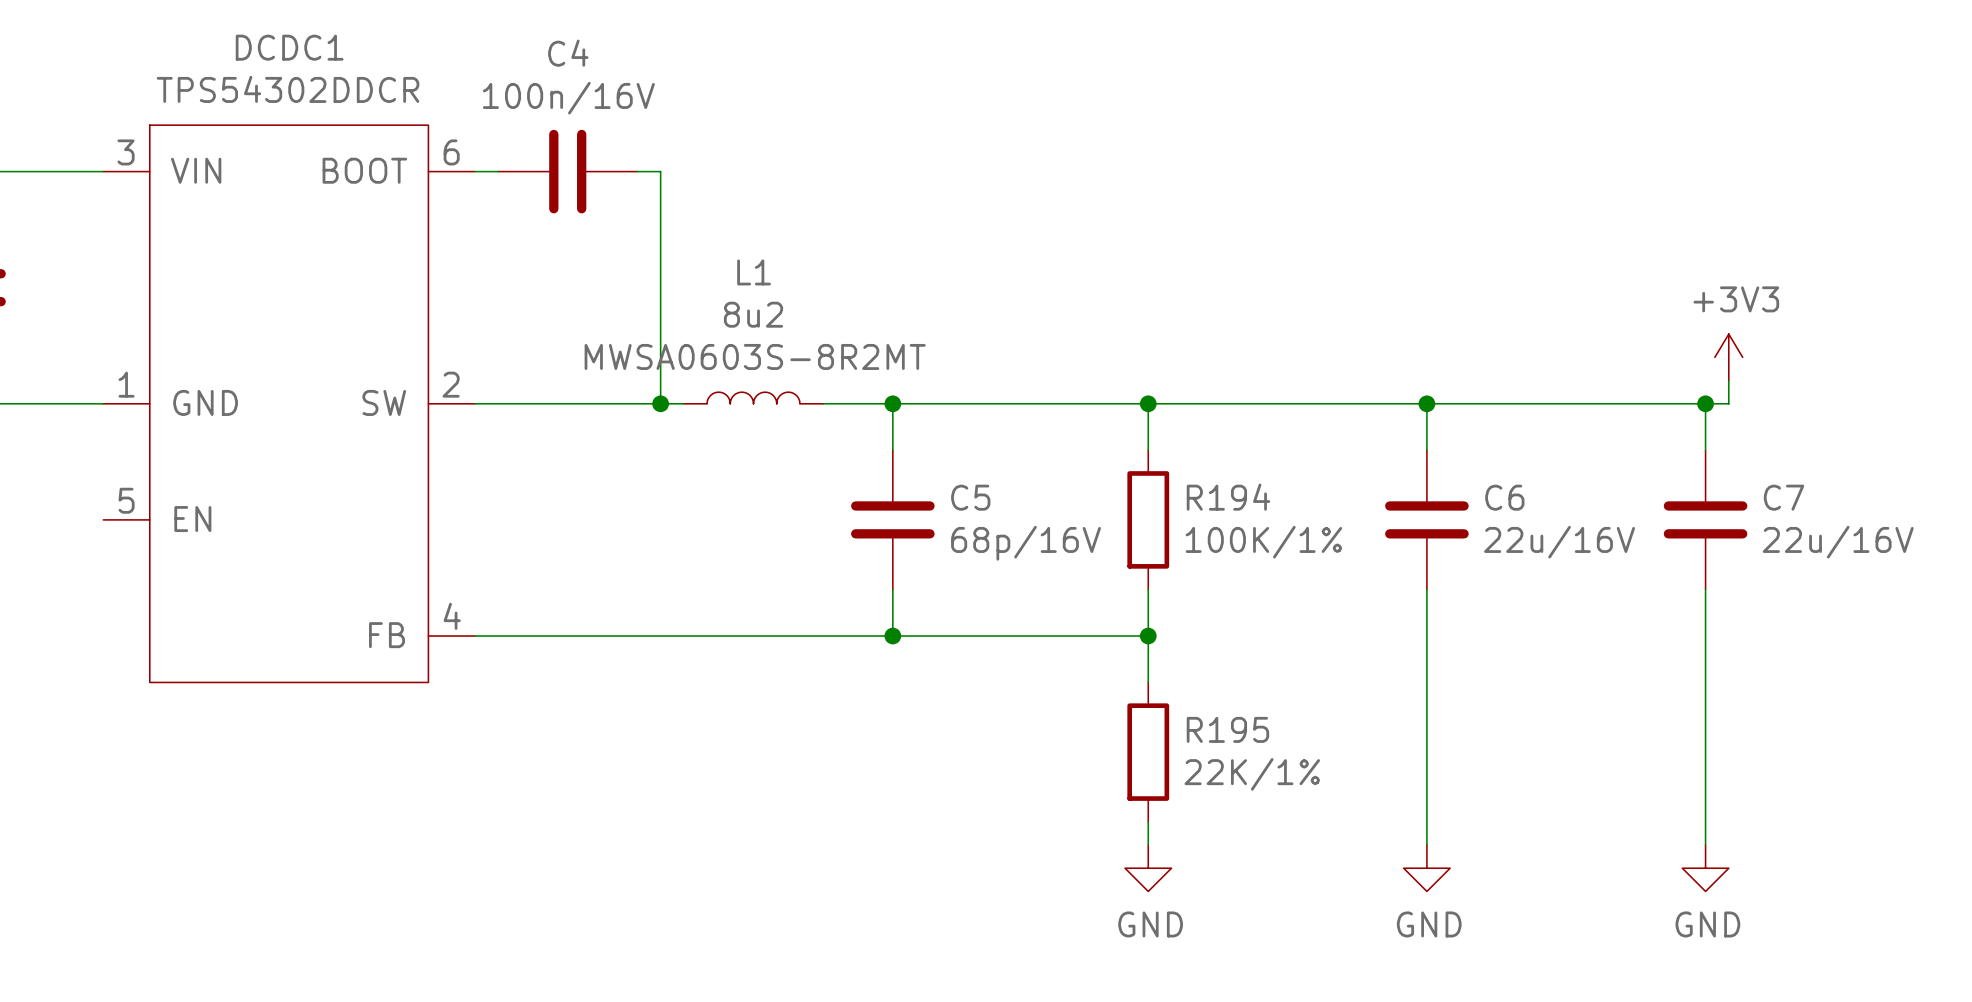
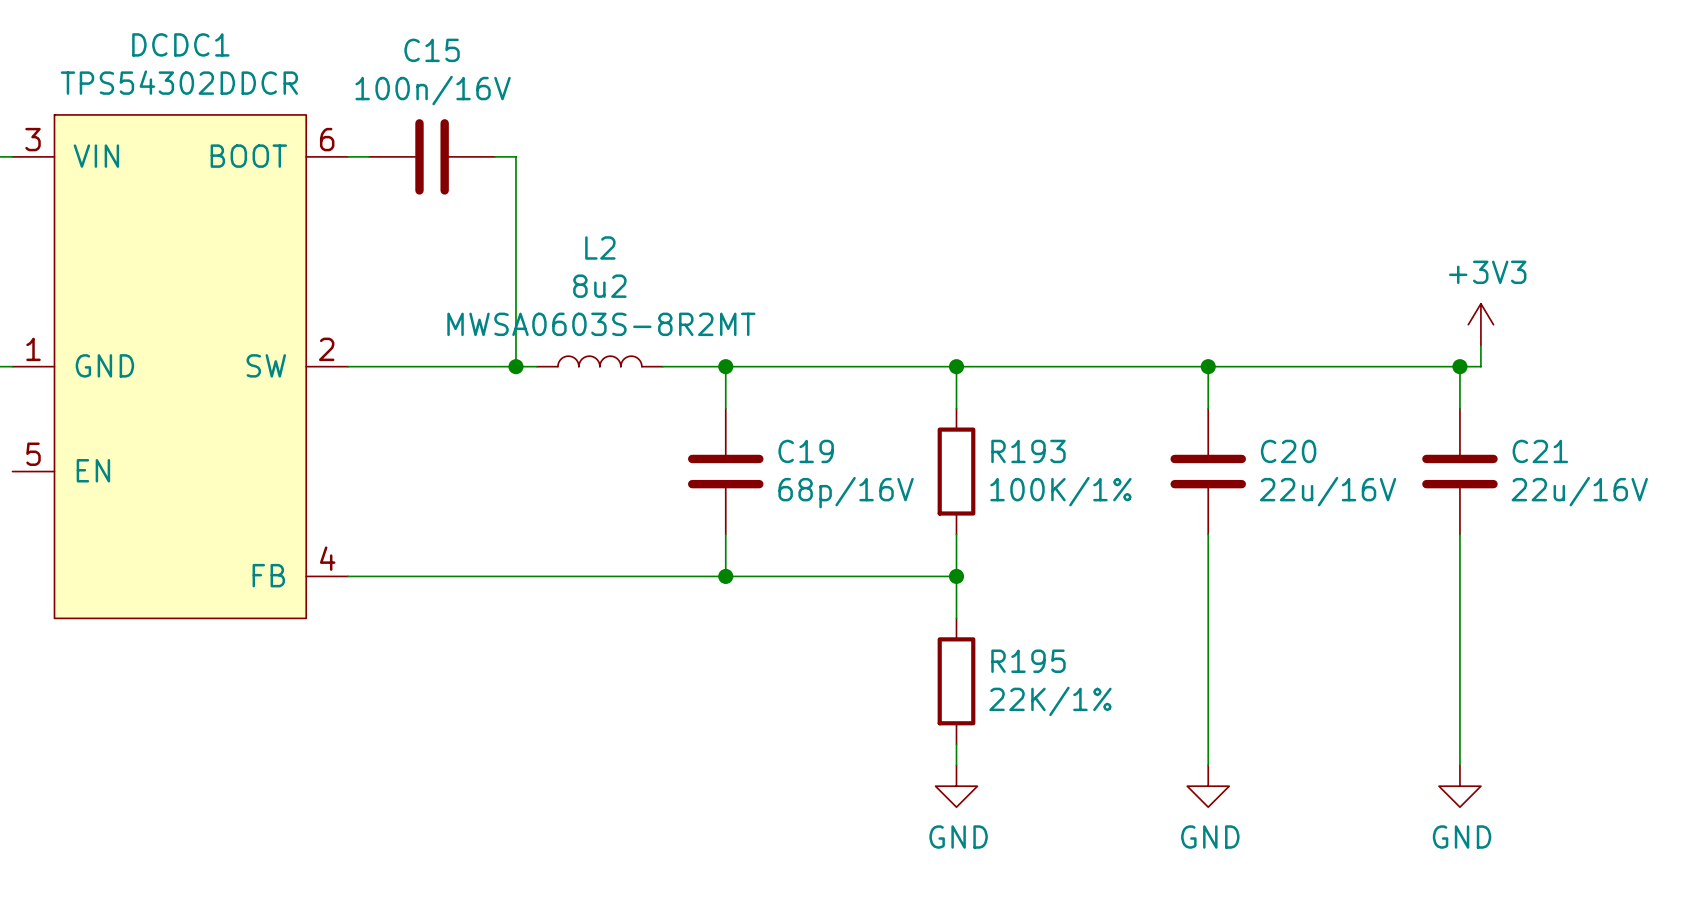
C4 name: C4 (568, 53) -> C15 (432, 50)
L1 name: L1 (754, 272) -> L2 (600, 247)
C5 name: C5 (970, 497) -> C19 (806, 451)
R194 name: R194 (1228, 497) -> R193 (1028, 451)
C6 name: C6 (1504, 497) -> C20 (1288, 451)
C7 name: C7 (1784, 497) -> C21 (1540, 451)

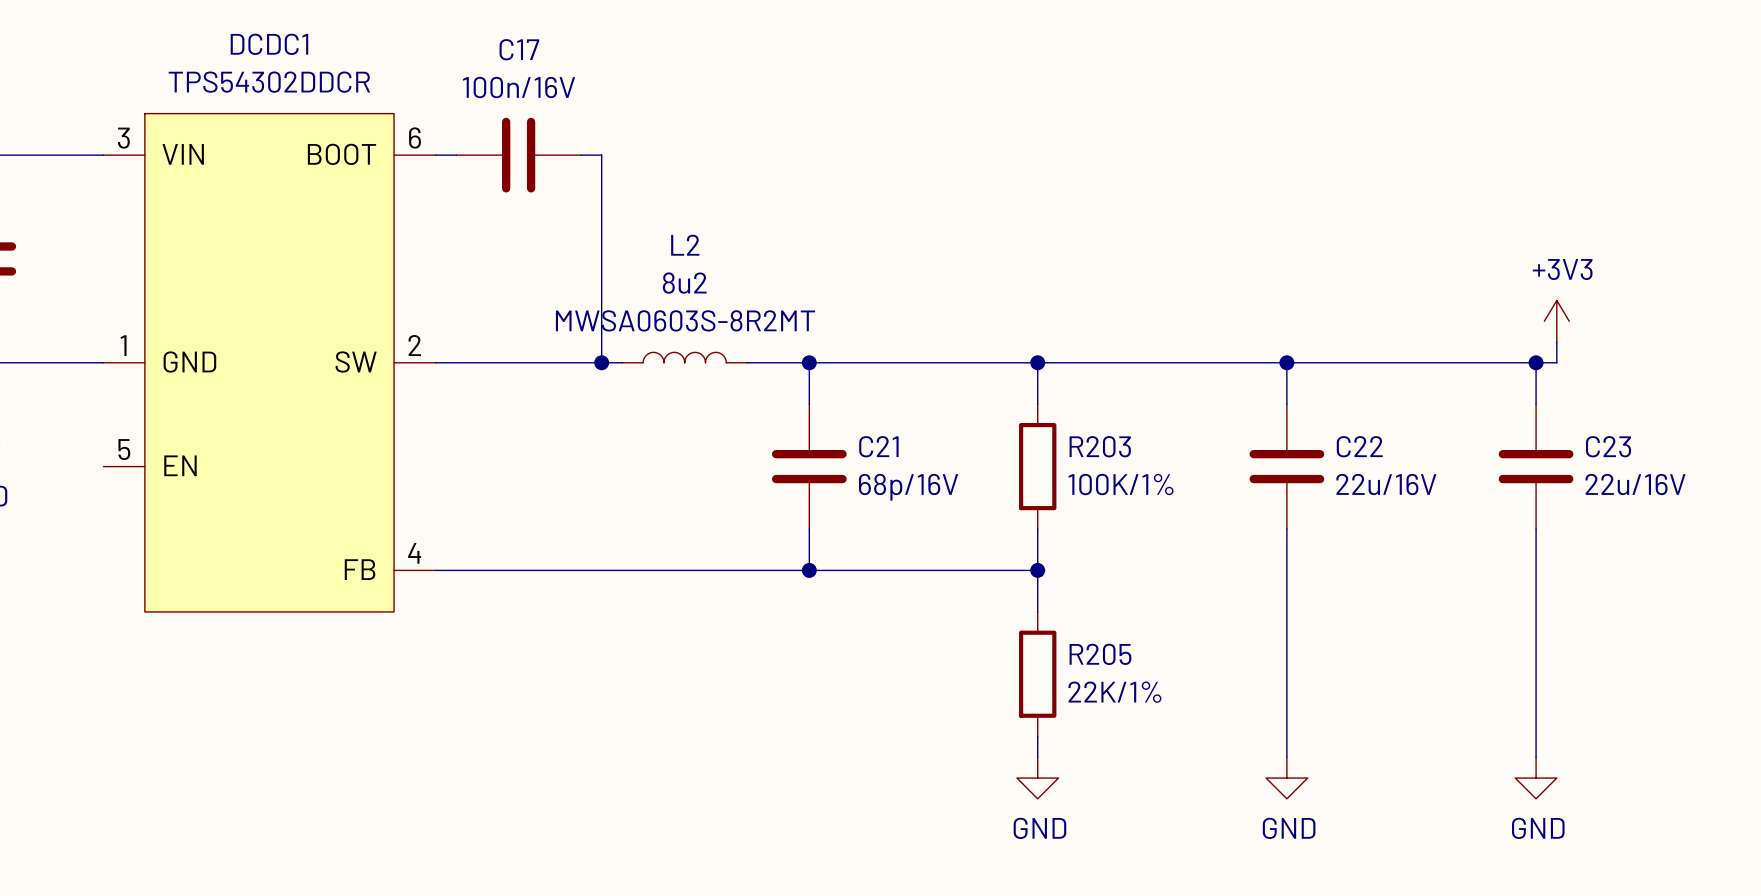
C15 name: C15 (432, 50) -> C17 (519, 49)
C19 name: C19 (806, 451) -> C21 (878, 446)
R193 name: R193 (1028, 451) -> R203 (1100, 446)
C20 name: C20 (1288, 451) -> C22 (1359, 446)
C21 name: C21 (1540, 451) -> C23 (1608, 446)
R195 name: R195 (1028, 661) -> R205 (1100, 654)

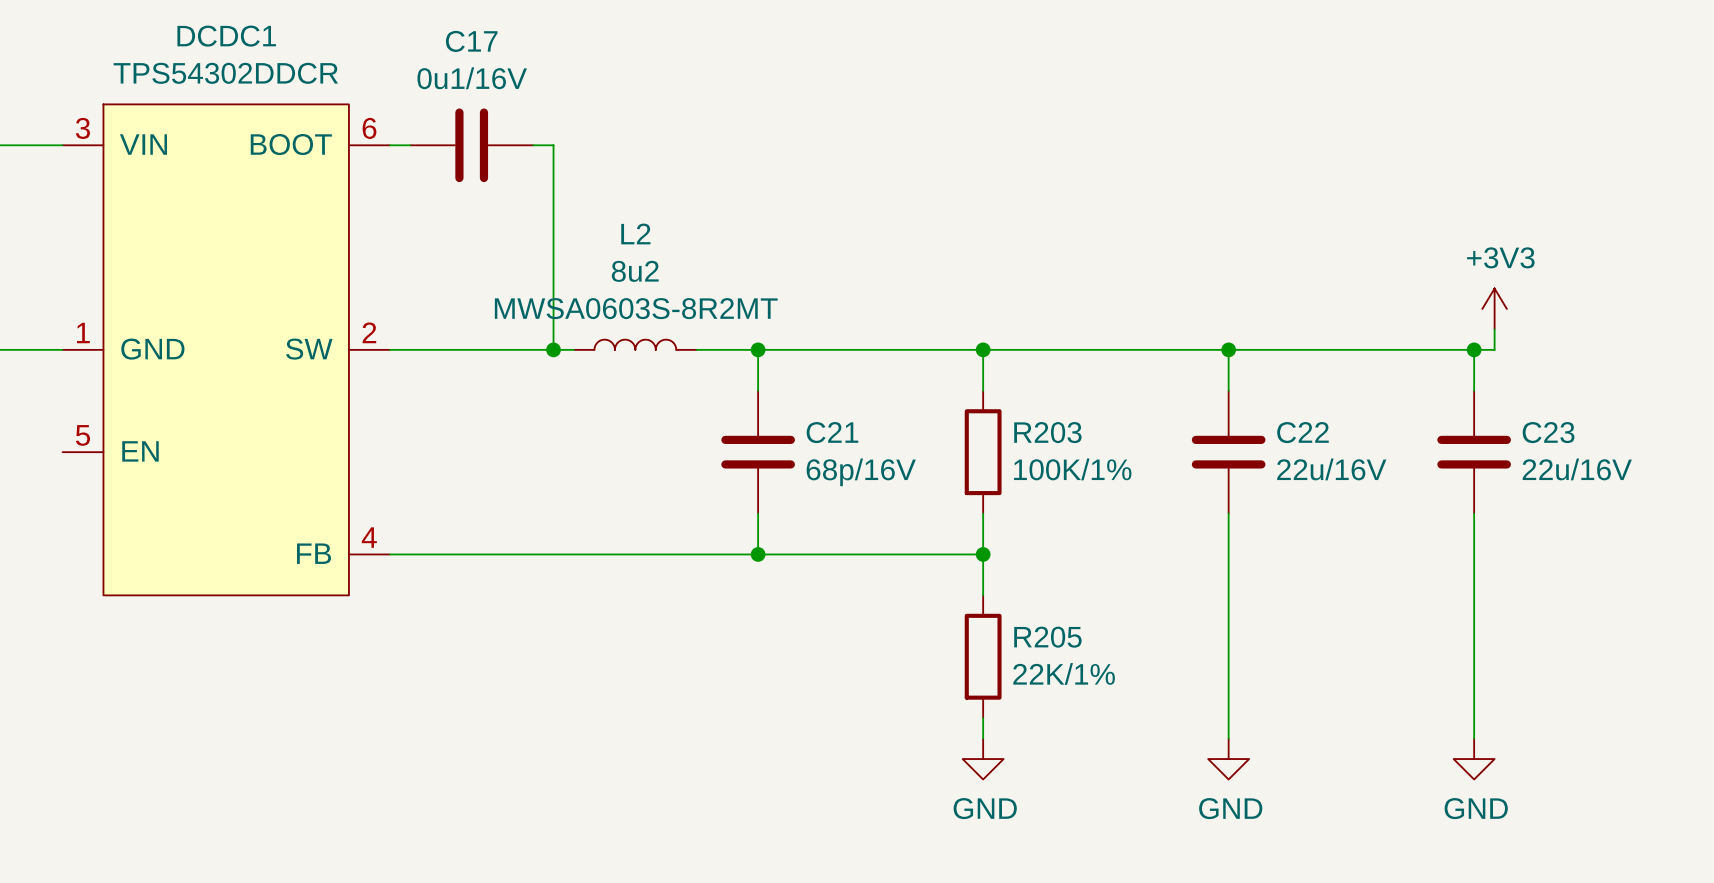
C17 value: 100n/16V (518, 87) -> 0u1/16V (472, 78)

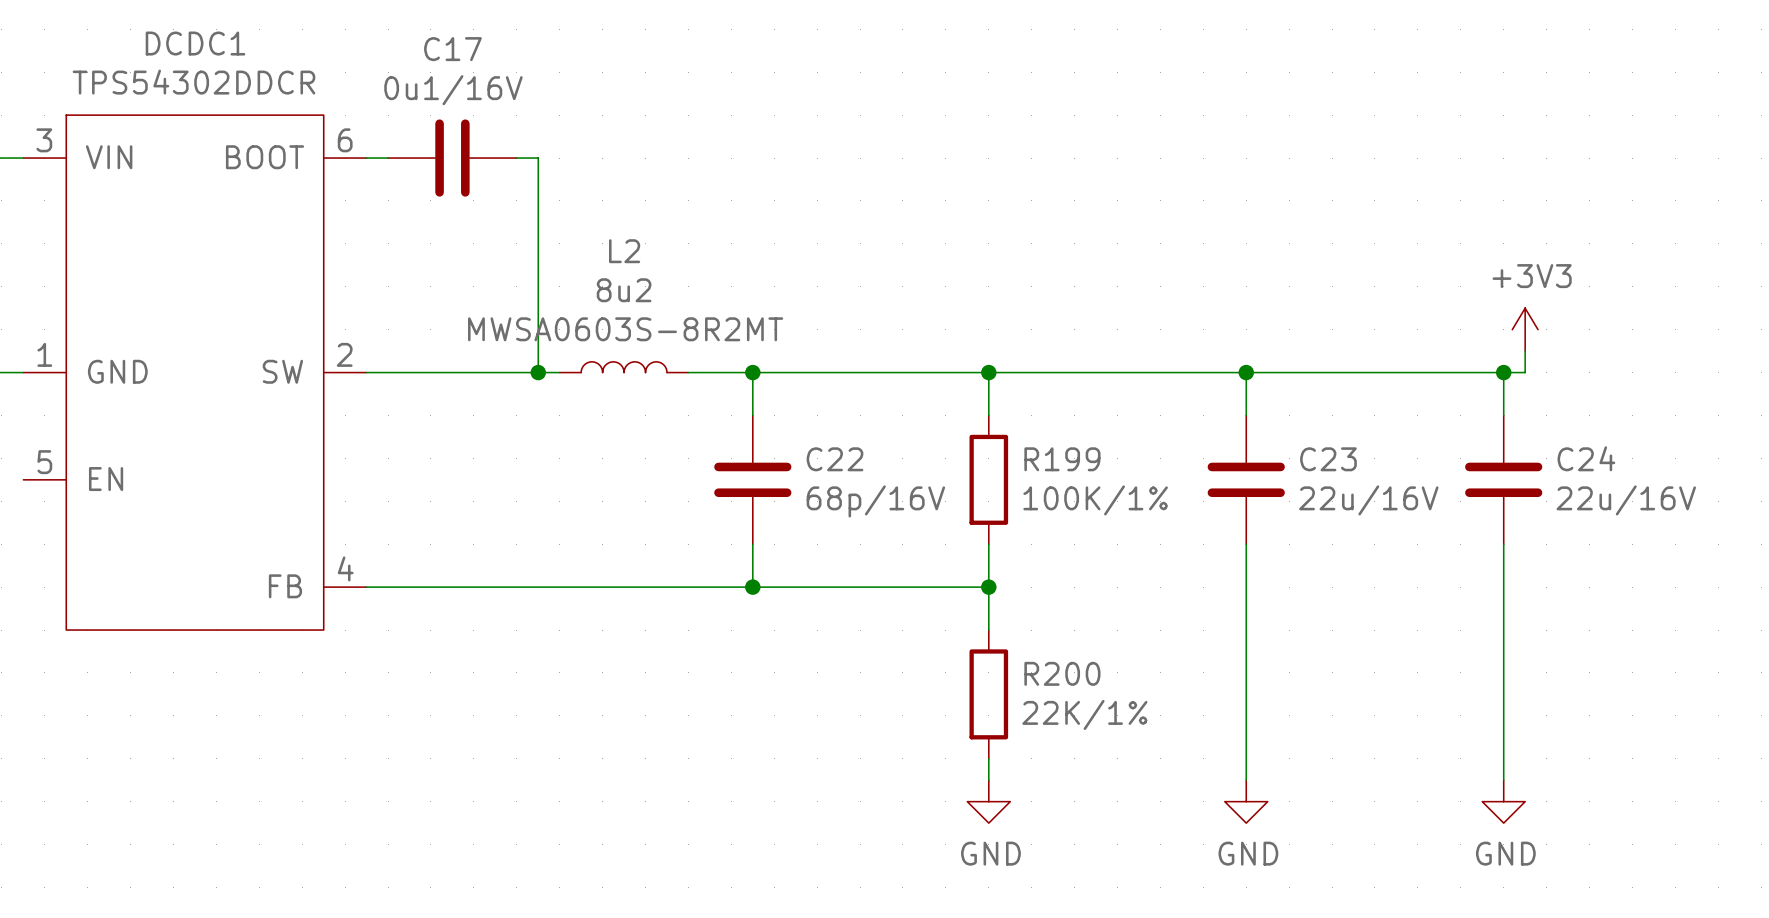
C21 name: C21 (832, 432) -> C22 (835, 459)
R203 name: R203 (1047, 432) -> R199 (1062, 459)
C22 name: C22 (1302, 432) -> C23 (1328, 459)
C23 name: C23 (1548, 432) -> C24 (1586, 458)
R205 name: R205 (1047, 637) -> R200 (1062, 673)

